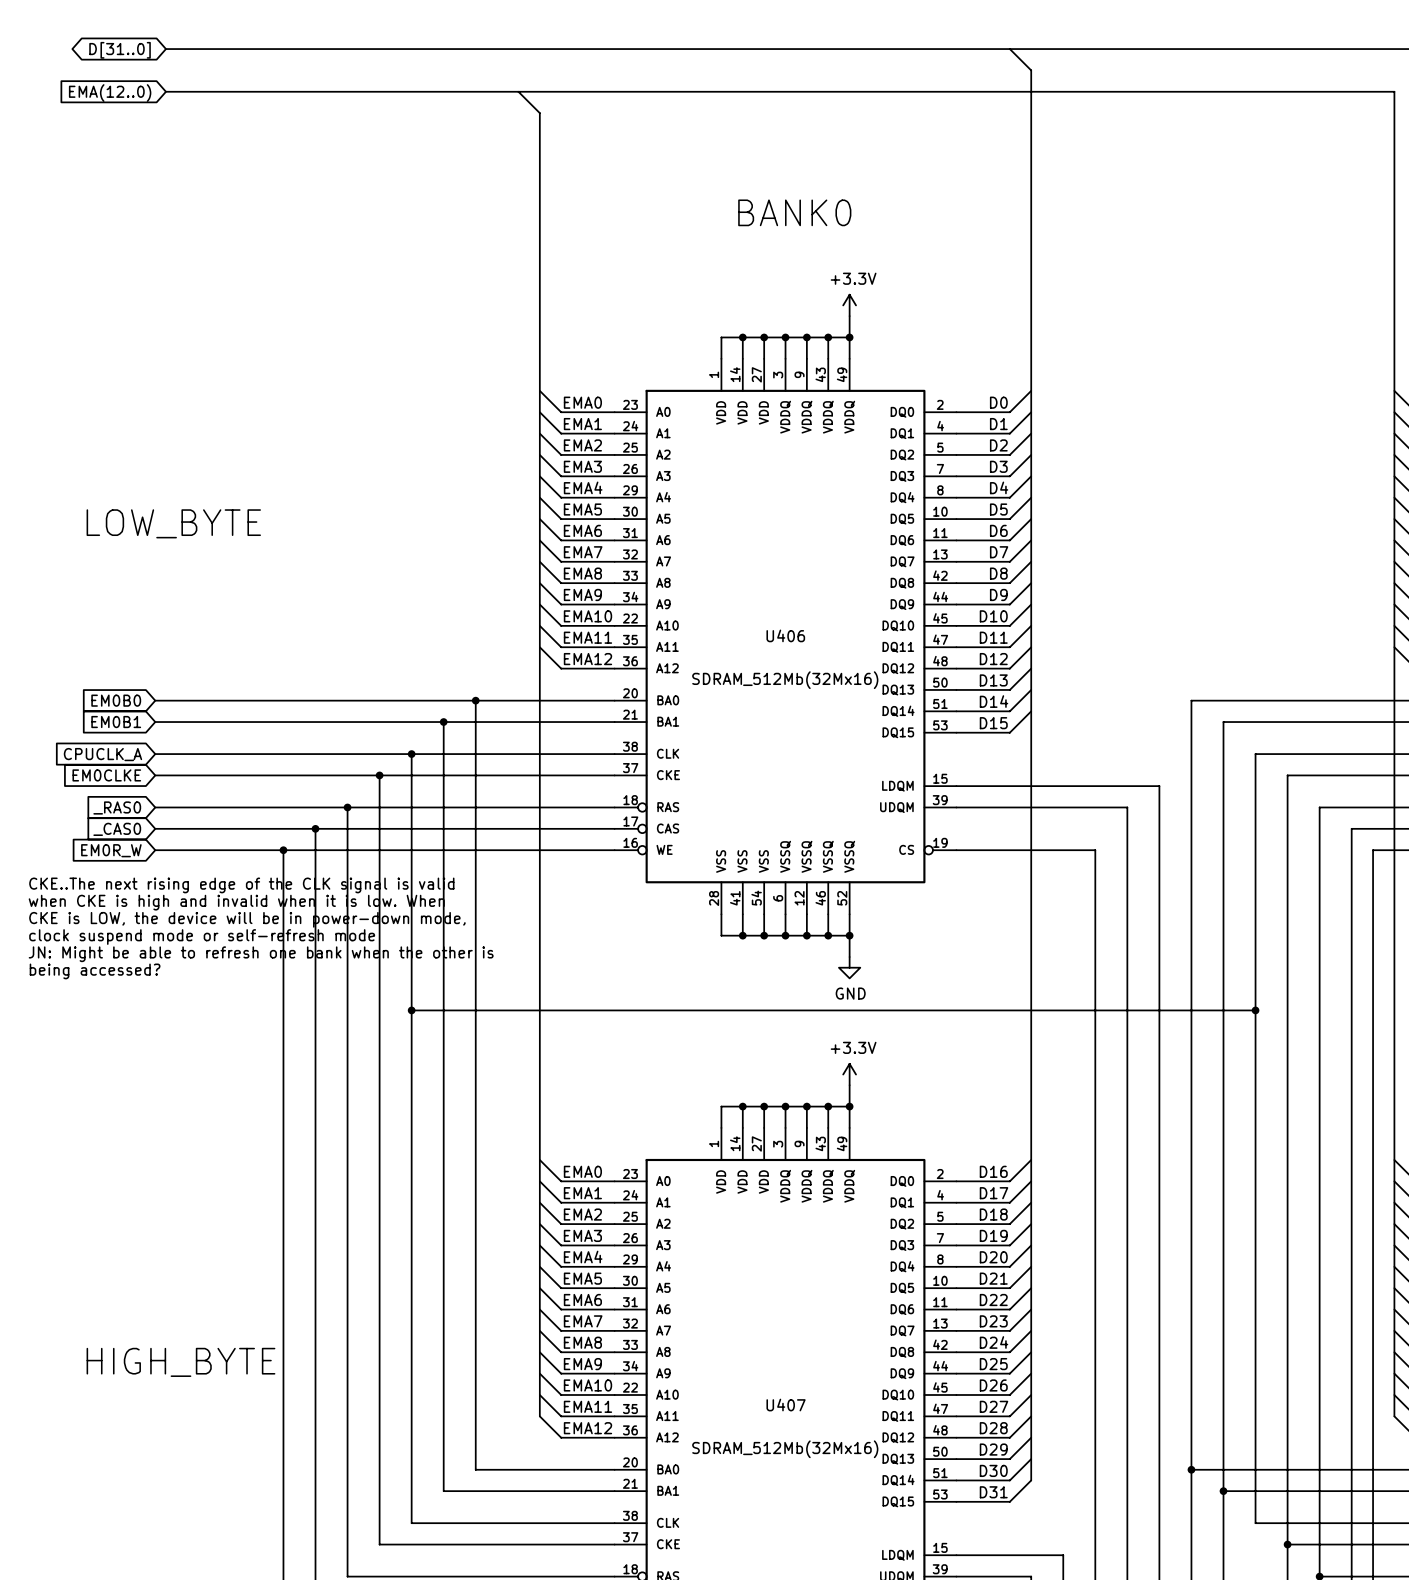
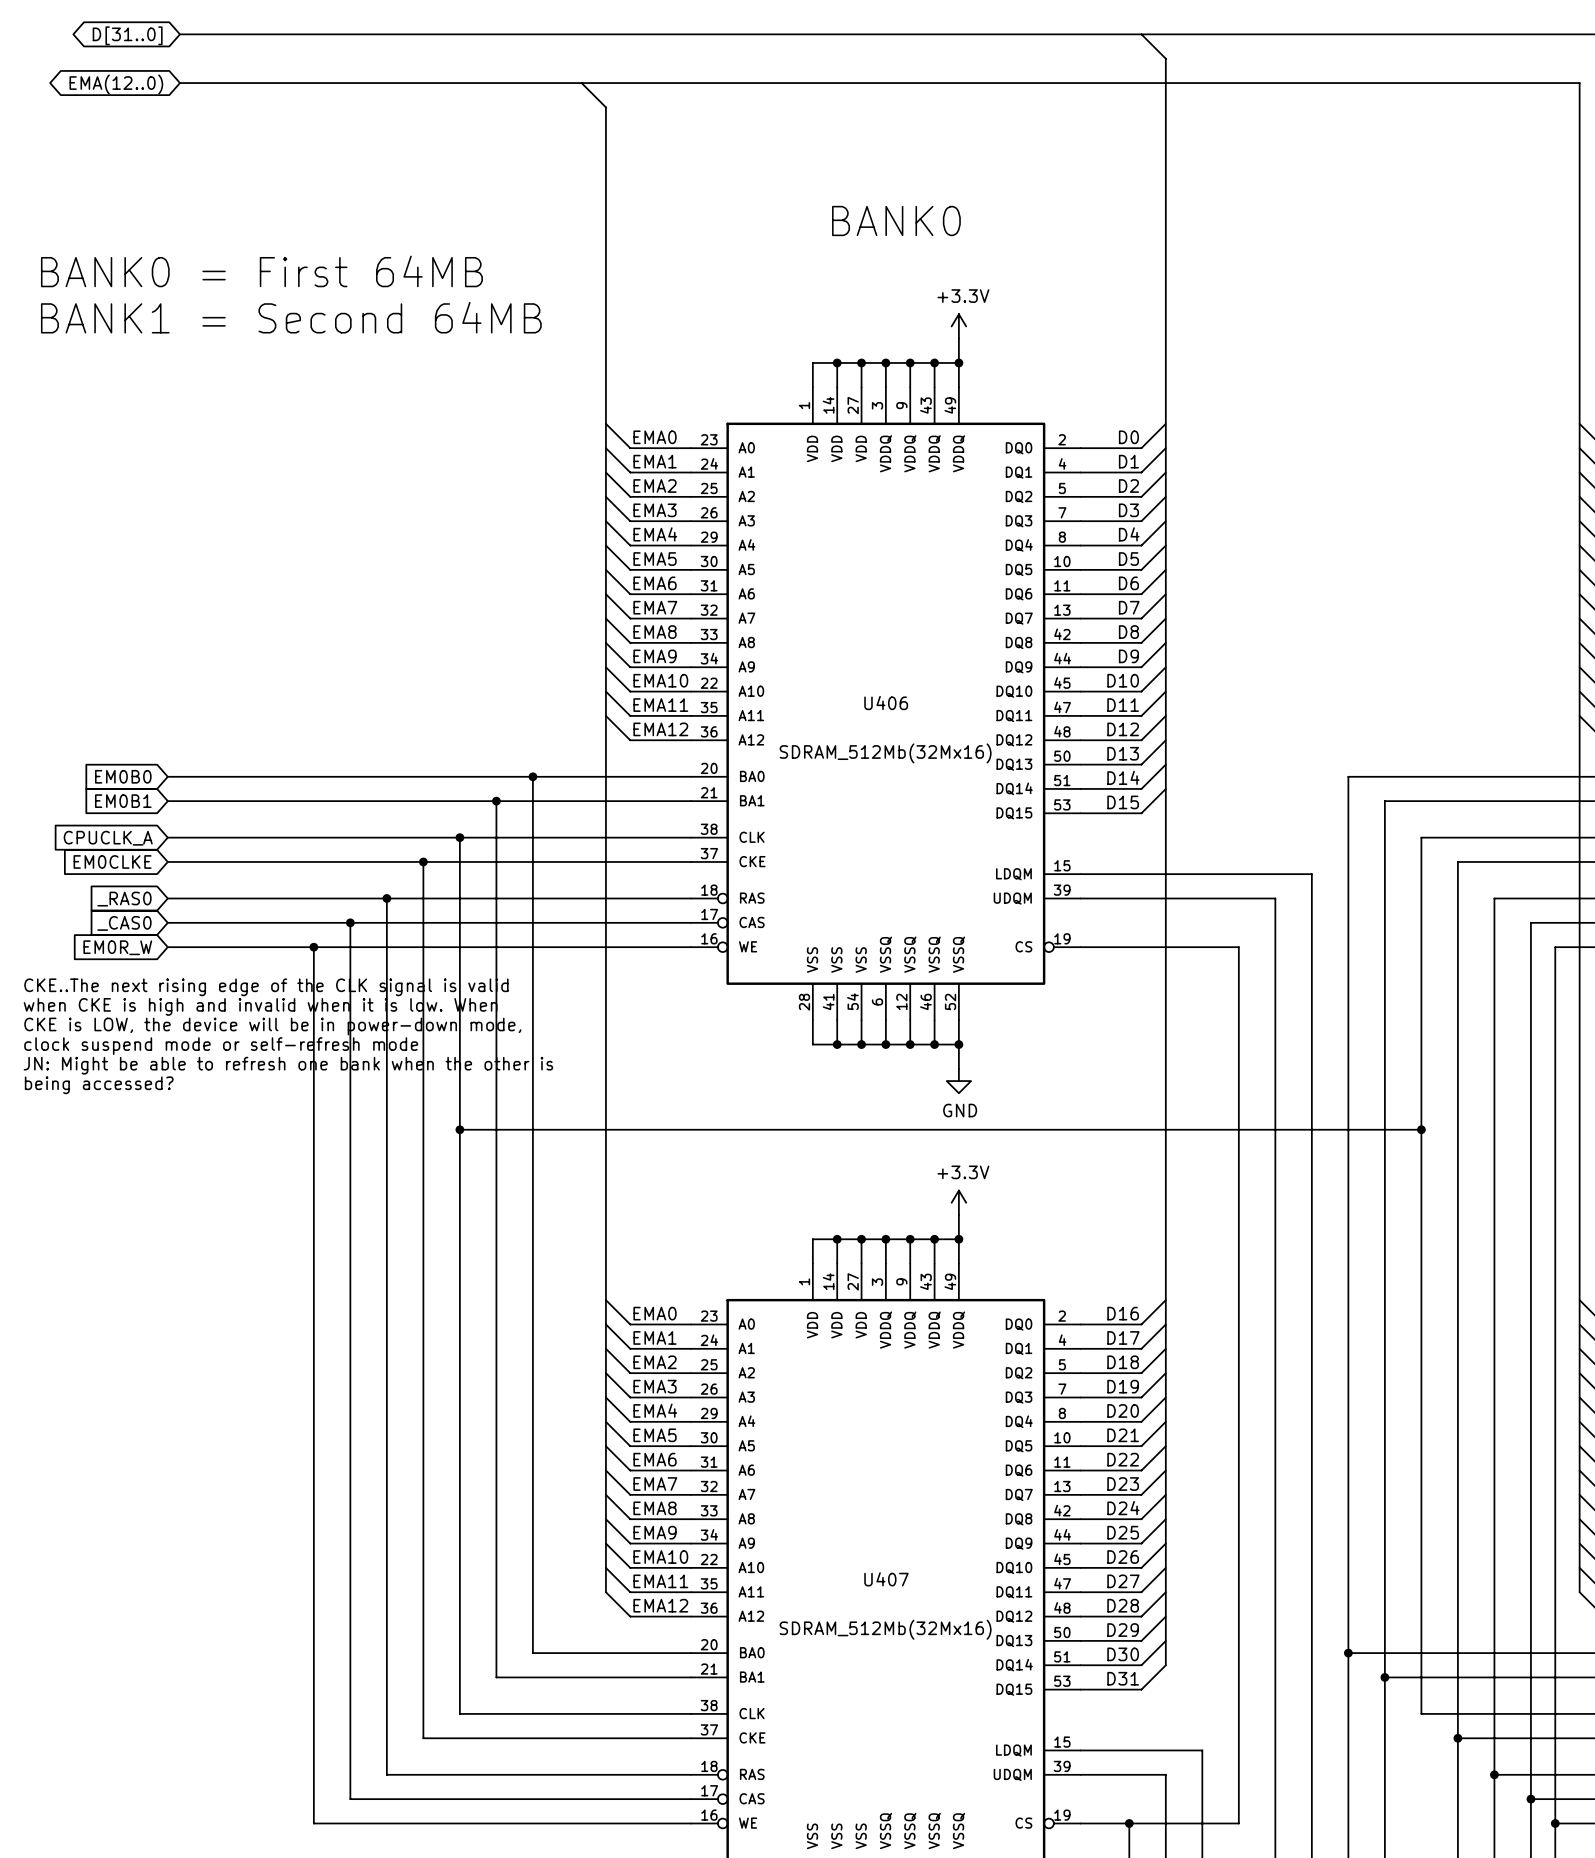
global label shape: input (110, 93) -> bidirectional (116, 84)
text: none -> BANK0 = First 64MB (261, 271)
text: none -> BANK1 = Second 64MB (291, 317)
text: LOW_BYTE (173, 523) -> none
text: HIGH_BYTE (180, 1362) -> none

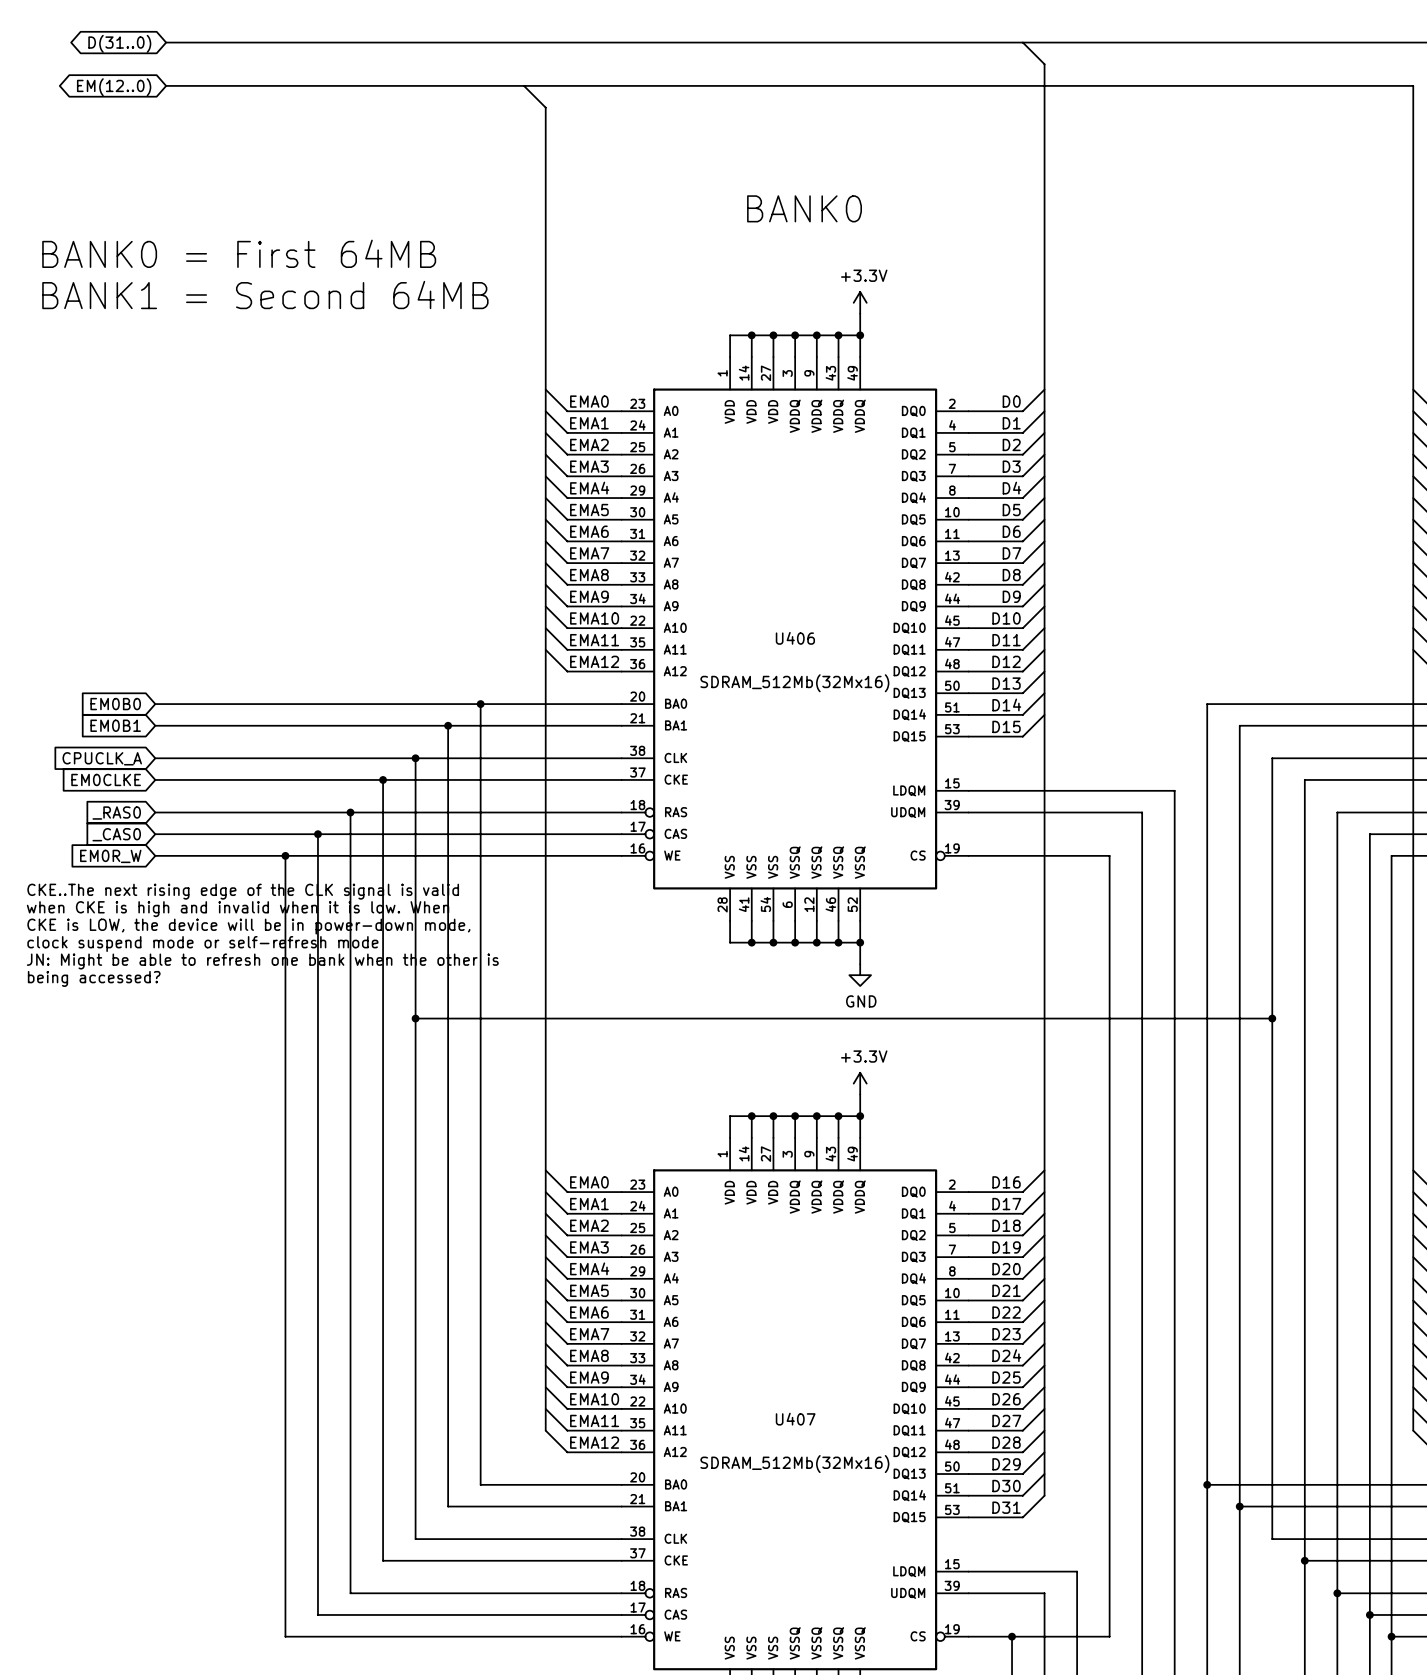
global label: D[31..0] (127, 35) -> D(31..0) (119, 43)
global label: EMA(12..0) (116, 84) -> EM(12..0) (114, 87)

